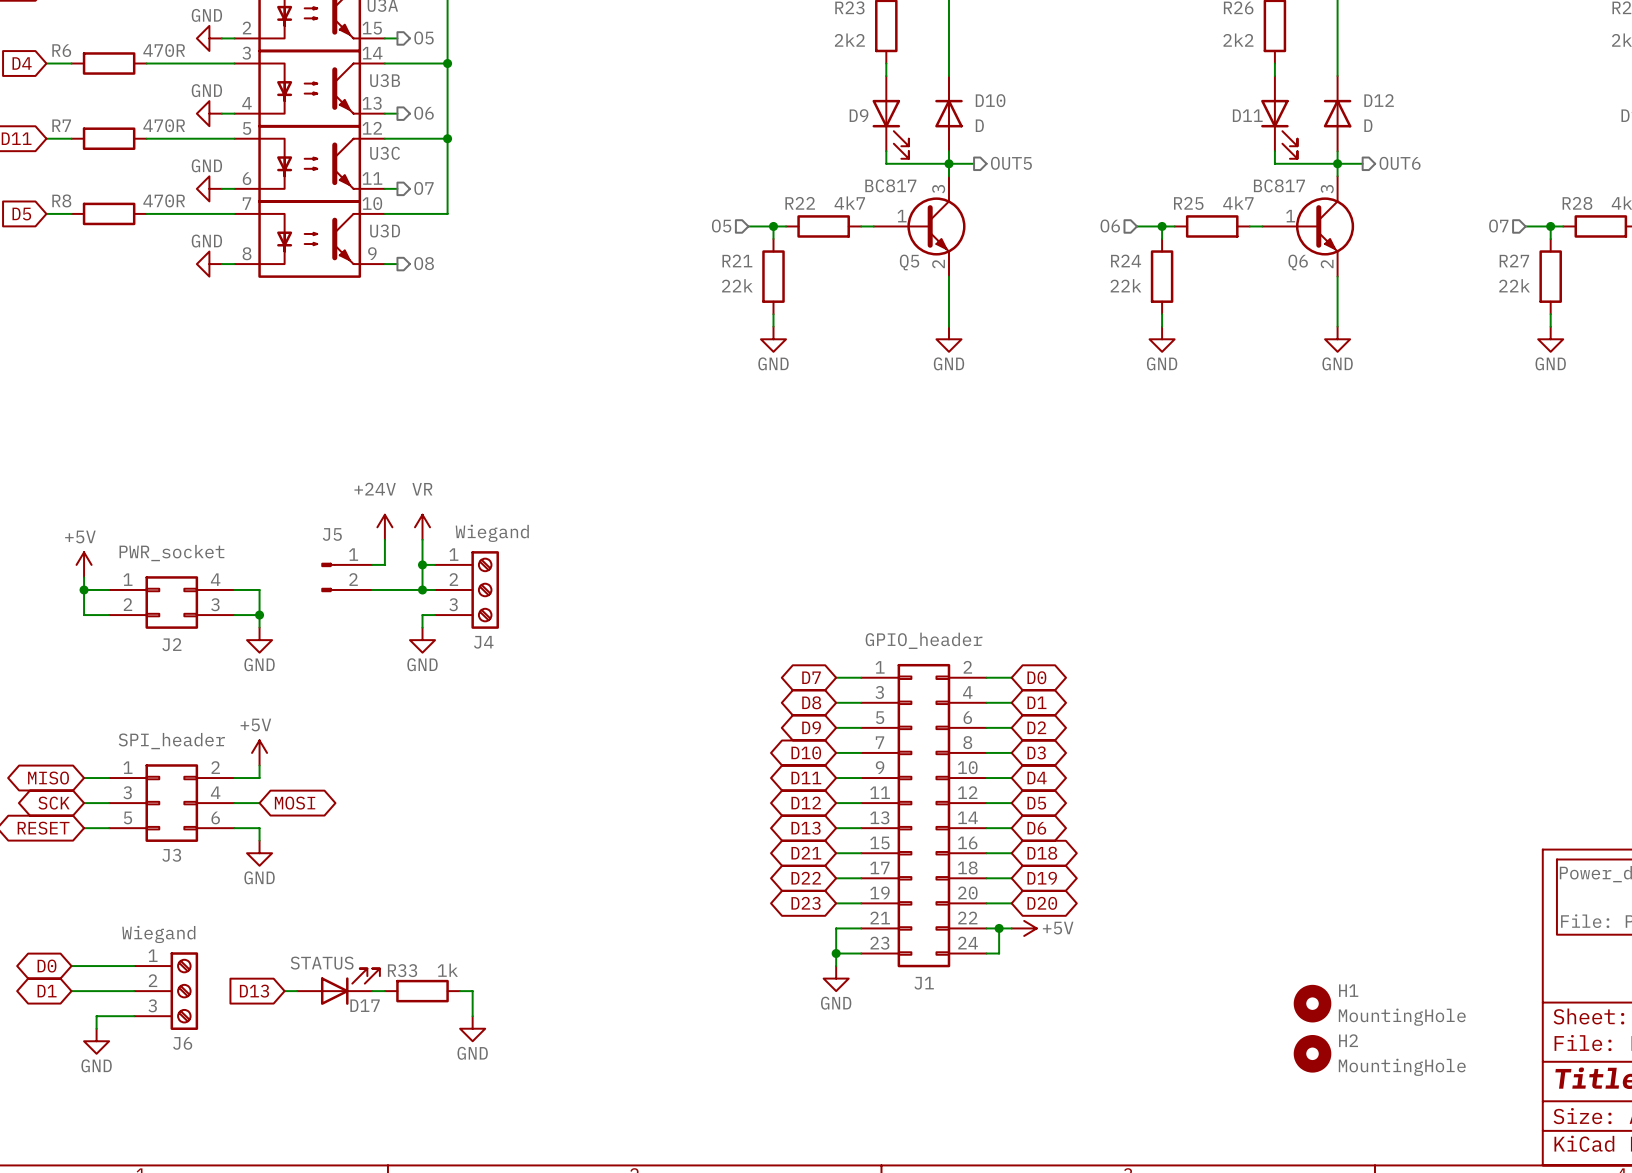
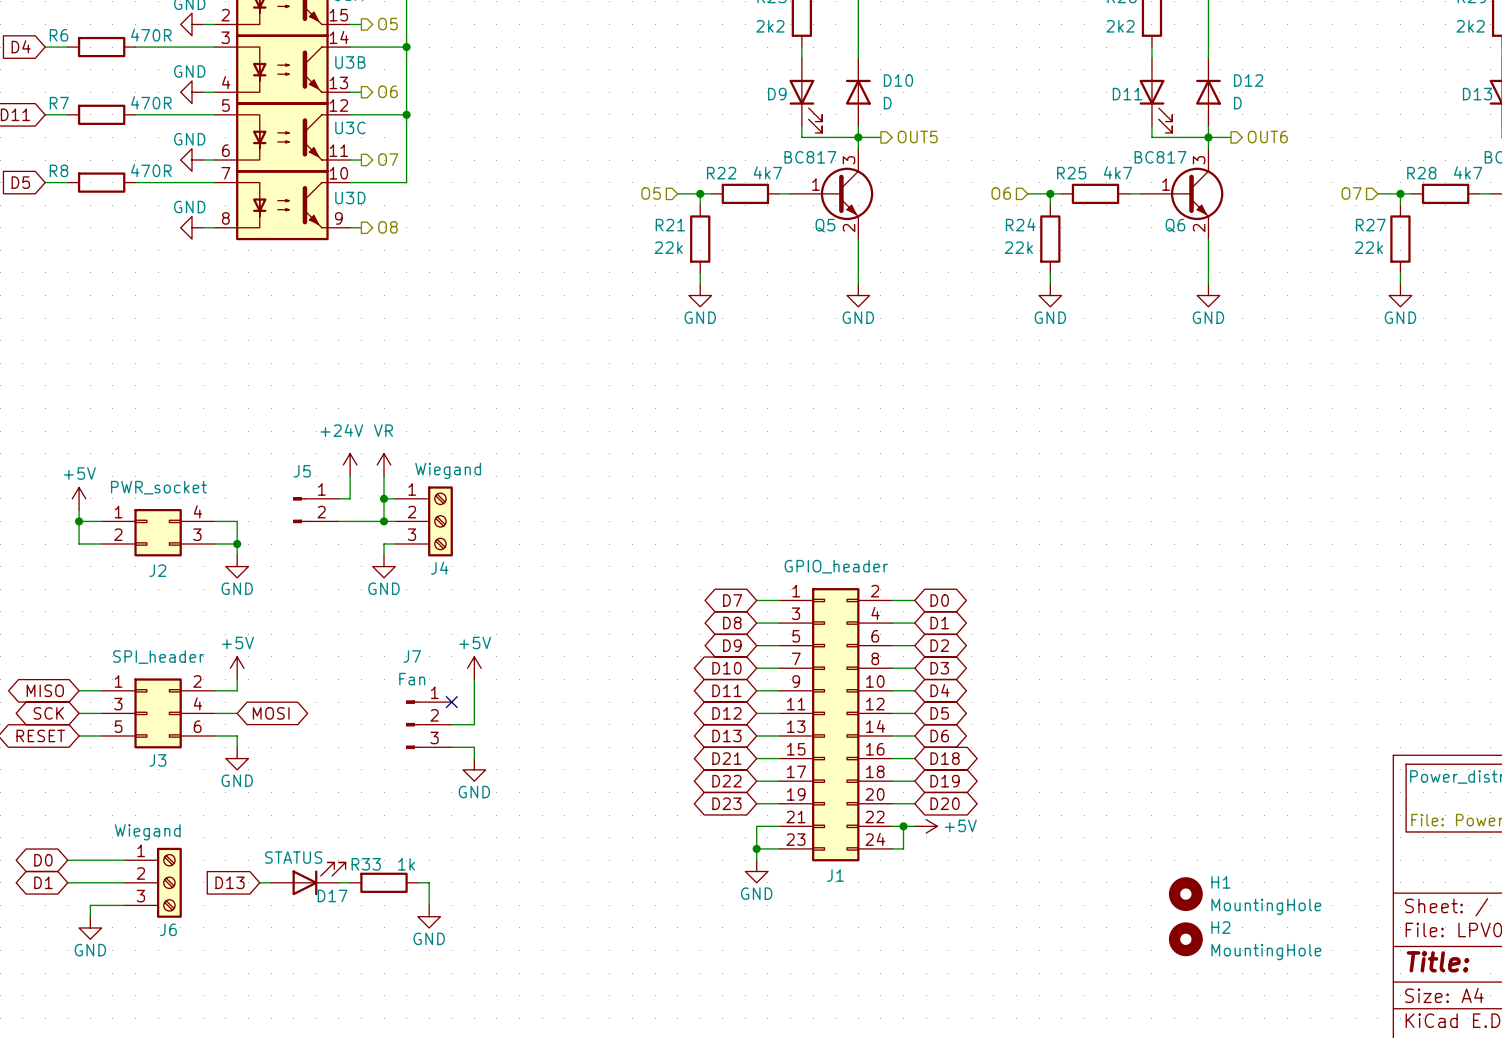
power symbol: none -> +5V (474, 668)
wire: none -> (474, 679) (474, 724) (451, 724)
no-connect mark: none -> (451, 702)
J7: none -> Fan (428, 724)
wire: none -> (451, 747) (474, 747) (474, 758)
power symbol: none -> GND (474, 769)

